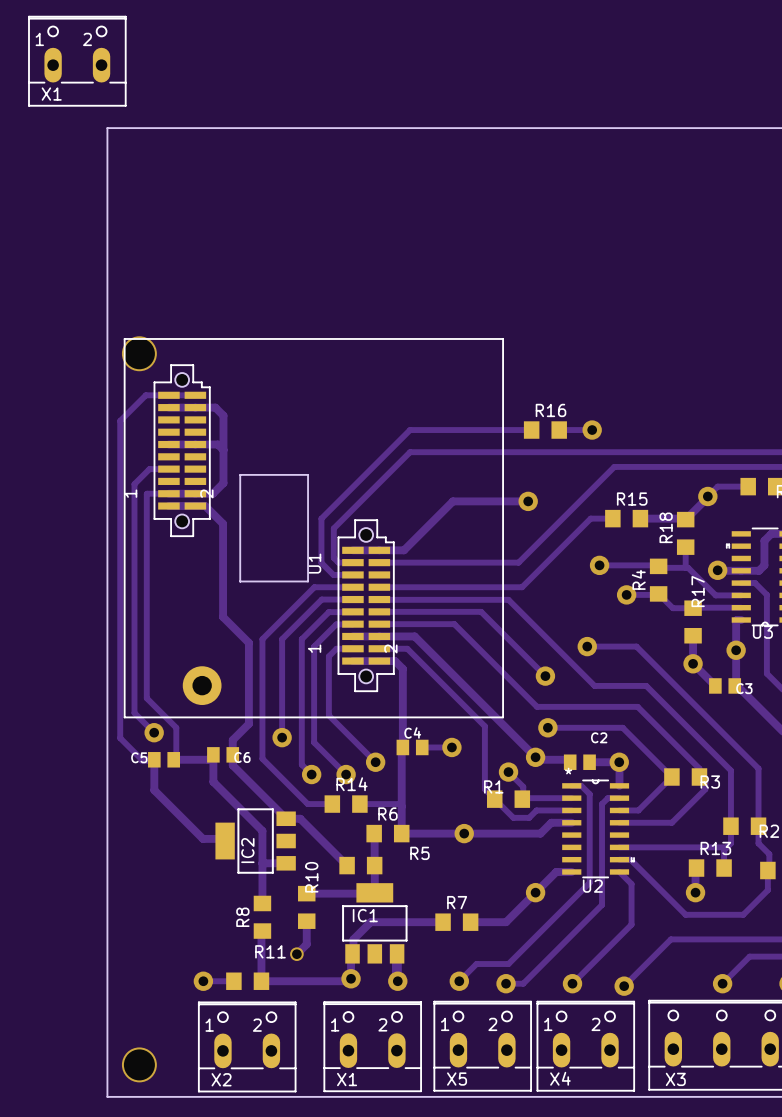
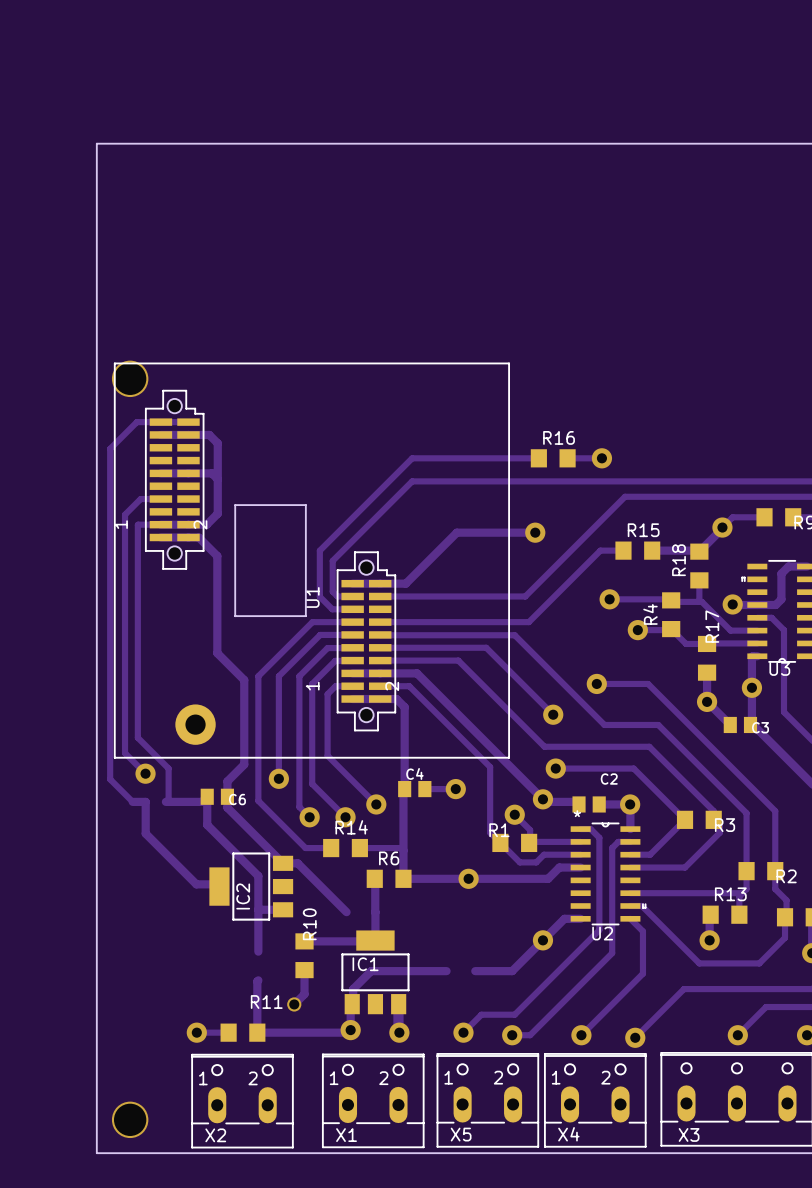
X1: (77, 61) -> none
C5: (164, 759) -> none
R5: (360, 865) -> none
R8: (262, 917) -> none
R7: (456, 922) -> none

